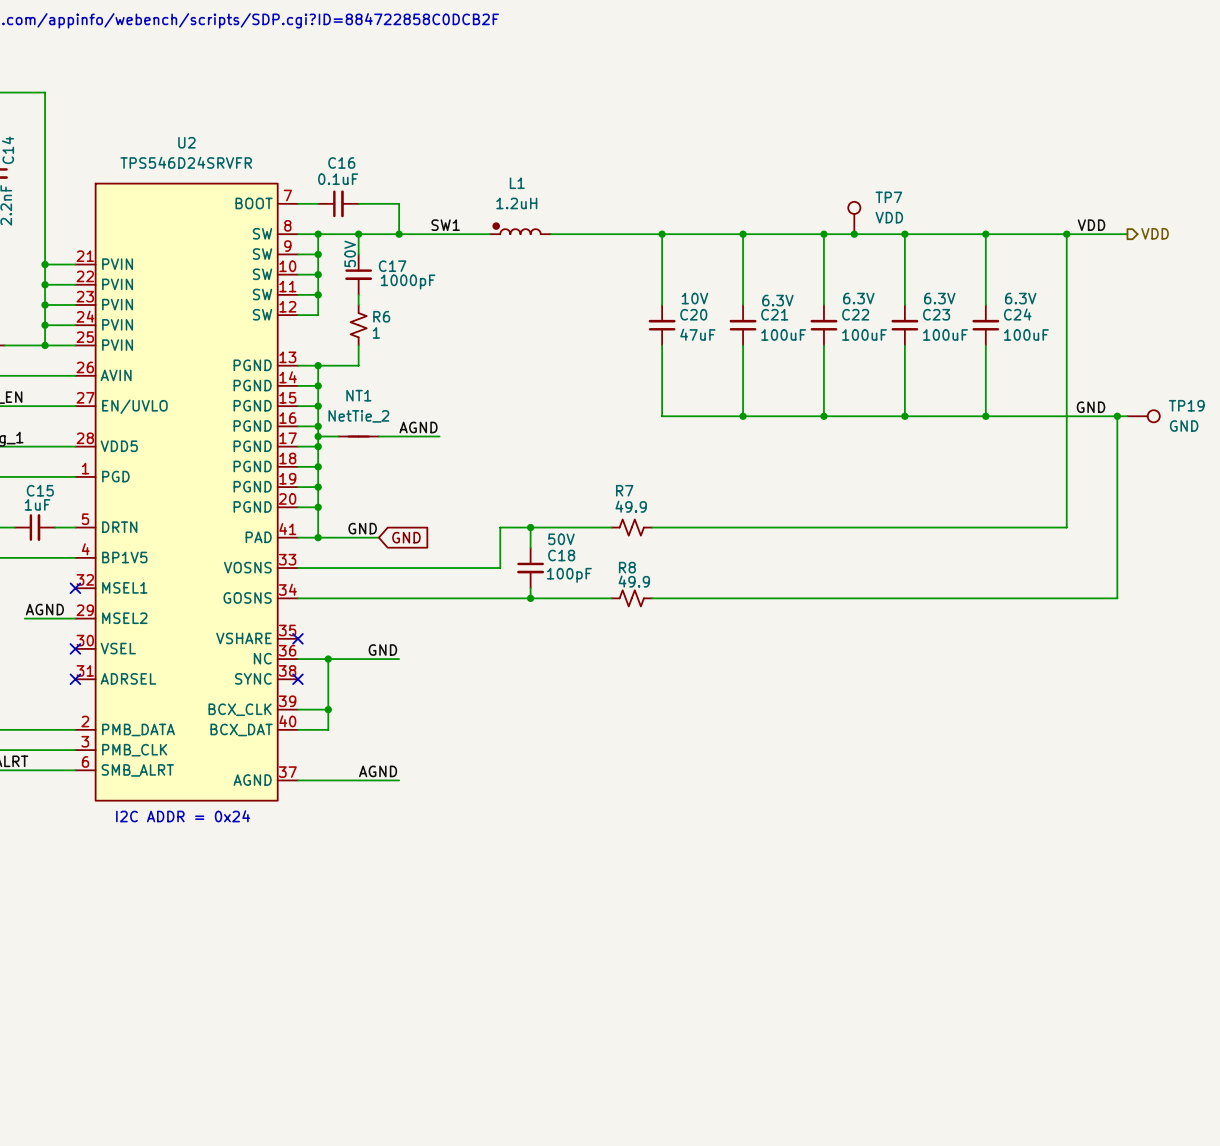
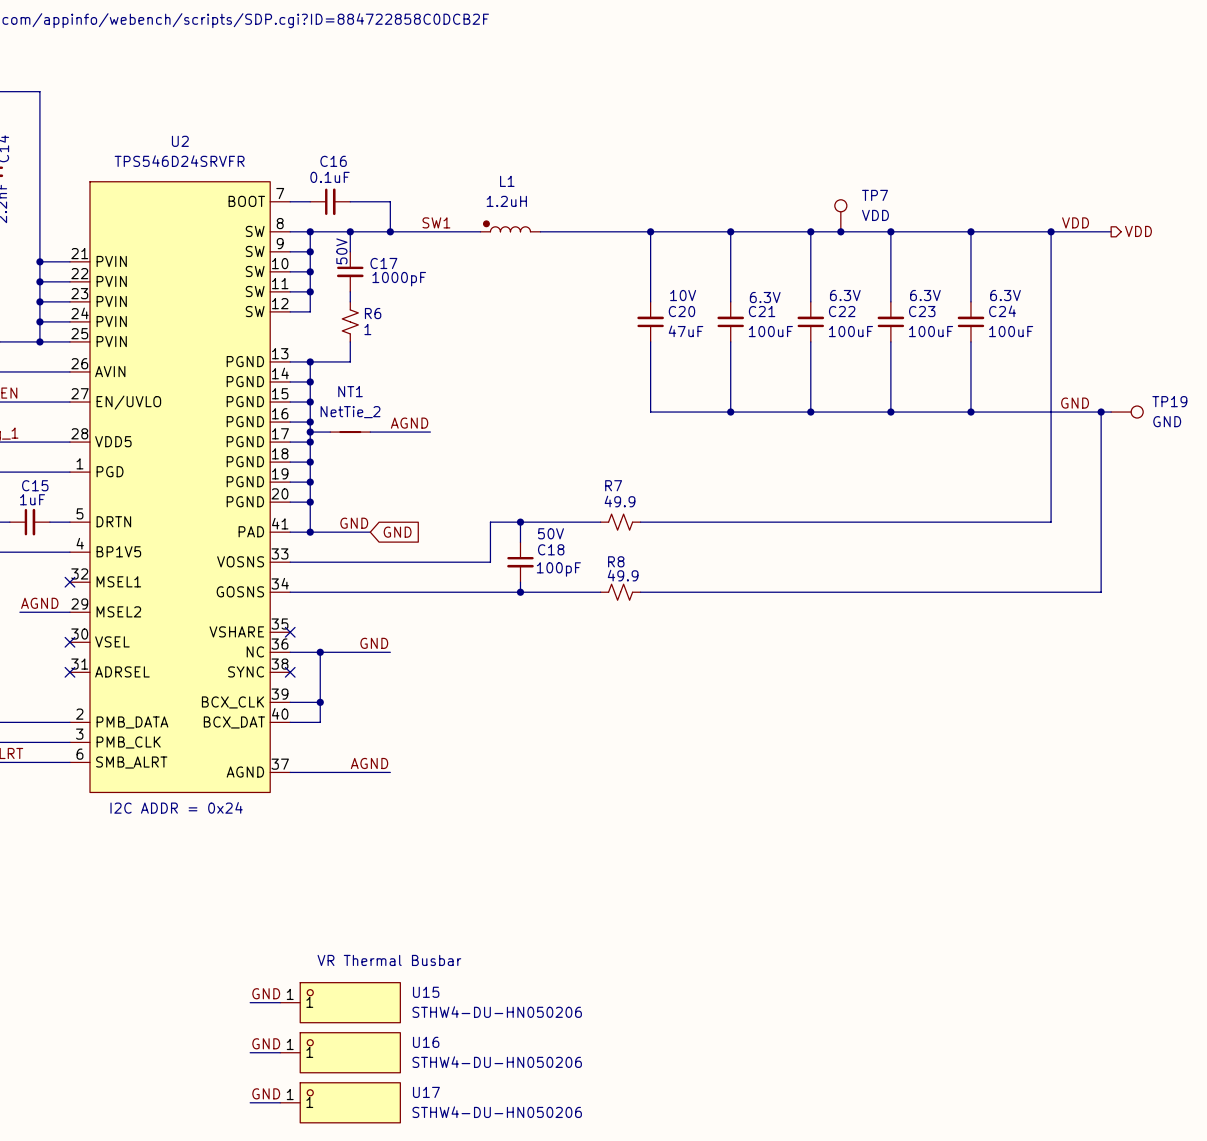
text: none -> VR Thermal Busbar (389, 960)
label: none -> GND (266, 993)
wire: none -> (250, 1002) (280, 1002)
U15: none -> STHW4-DU-HN050206 (340, 1002)
label: none -> GND (266, 1043)
wire: none -> (250, 1052) (280, 1052)
U16: none -> STHW4-DU-HN050206 (340, 1052)
label: none -> GND (266, 1093)
wire: none -> (250, 1102) (280, 1102)
U17: none -> STHW4-DU-HN050206 (340, 1102)

